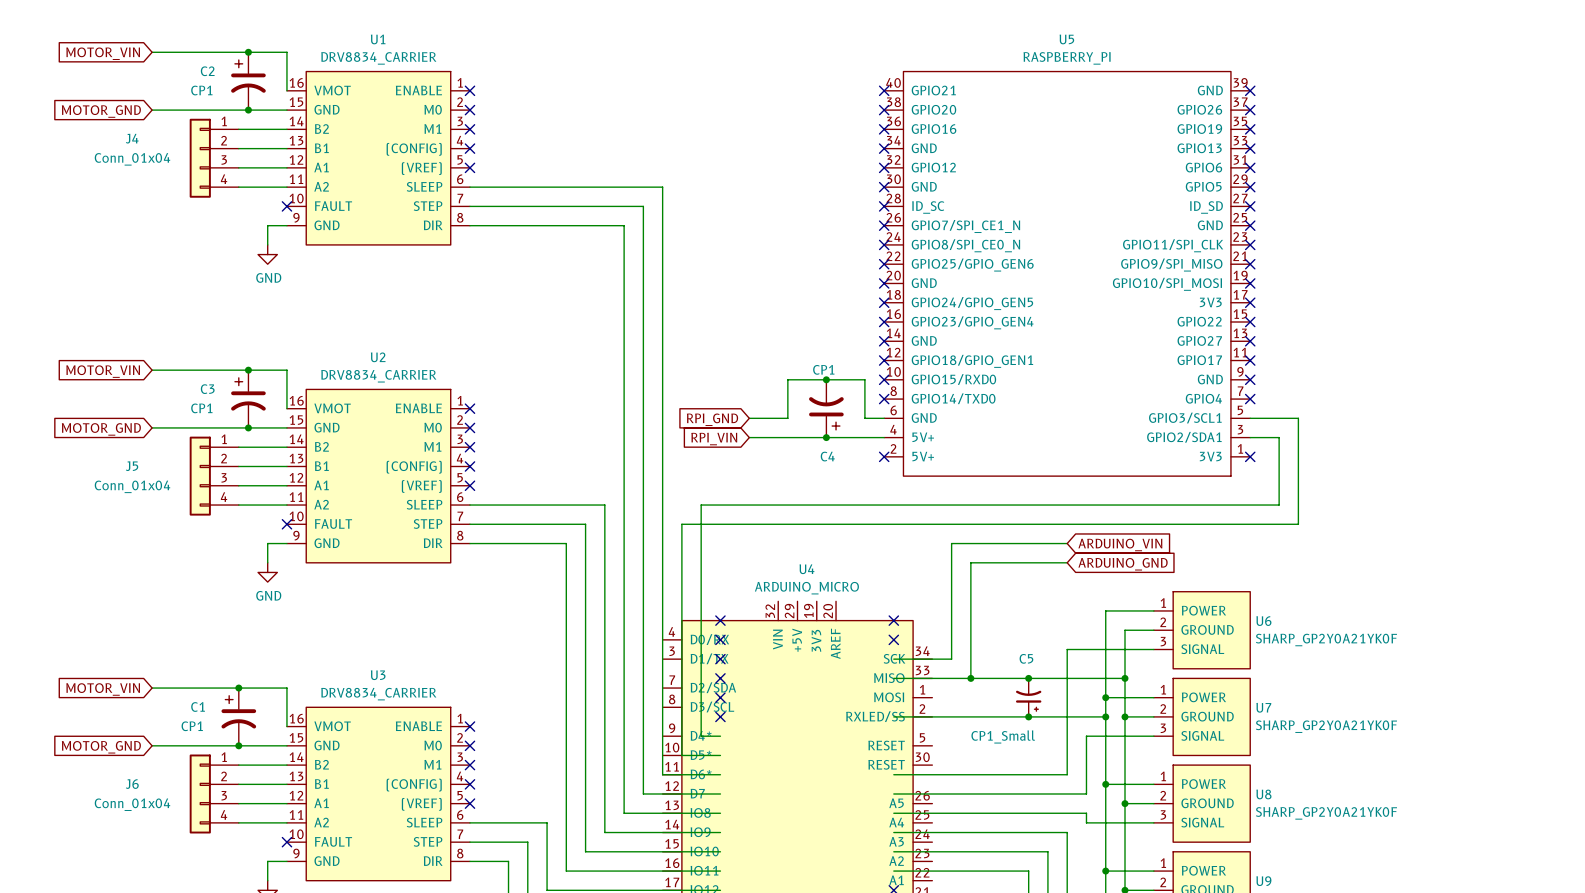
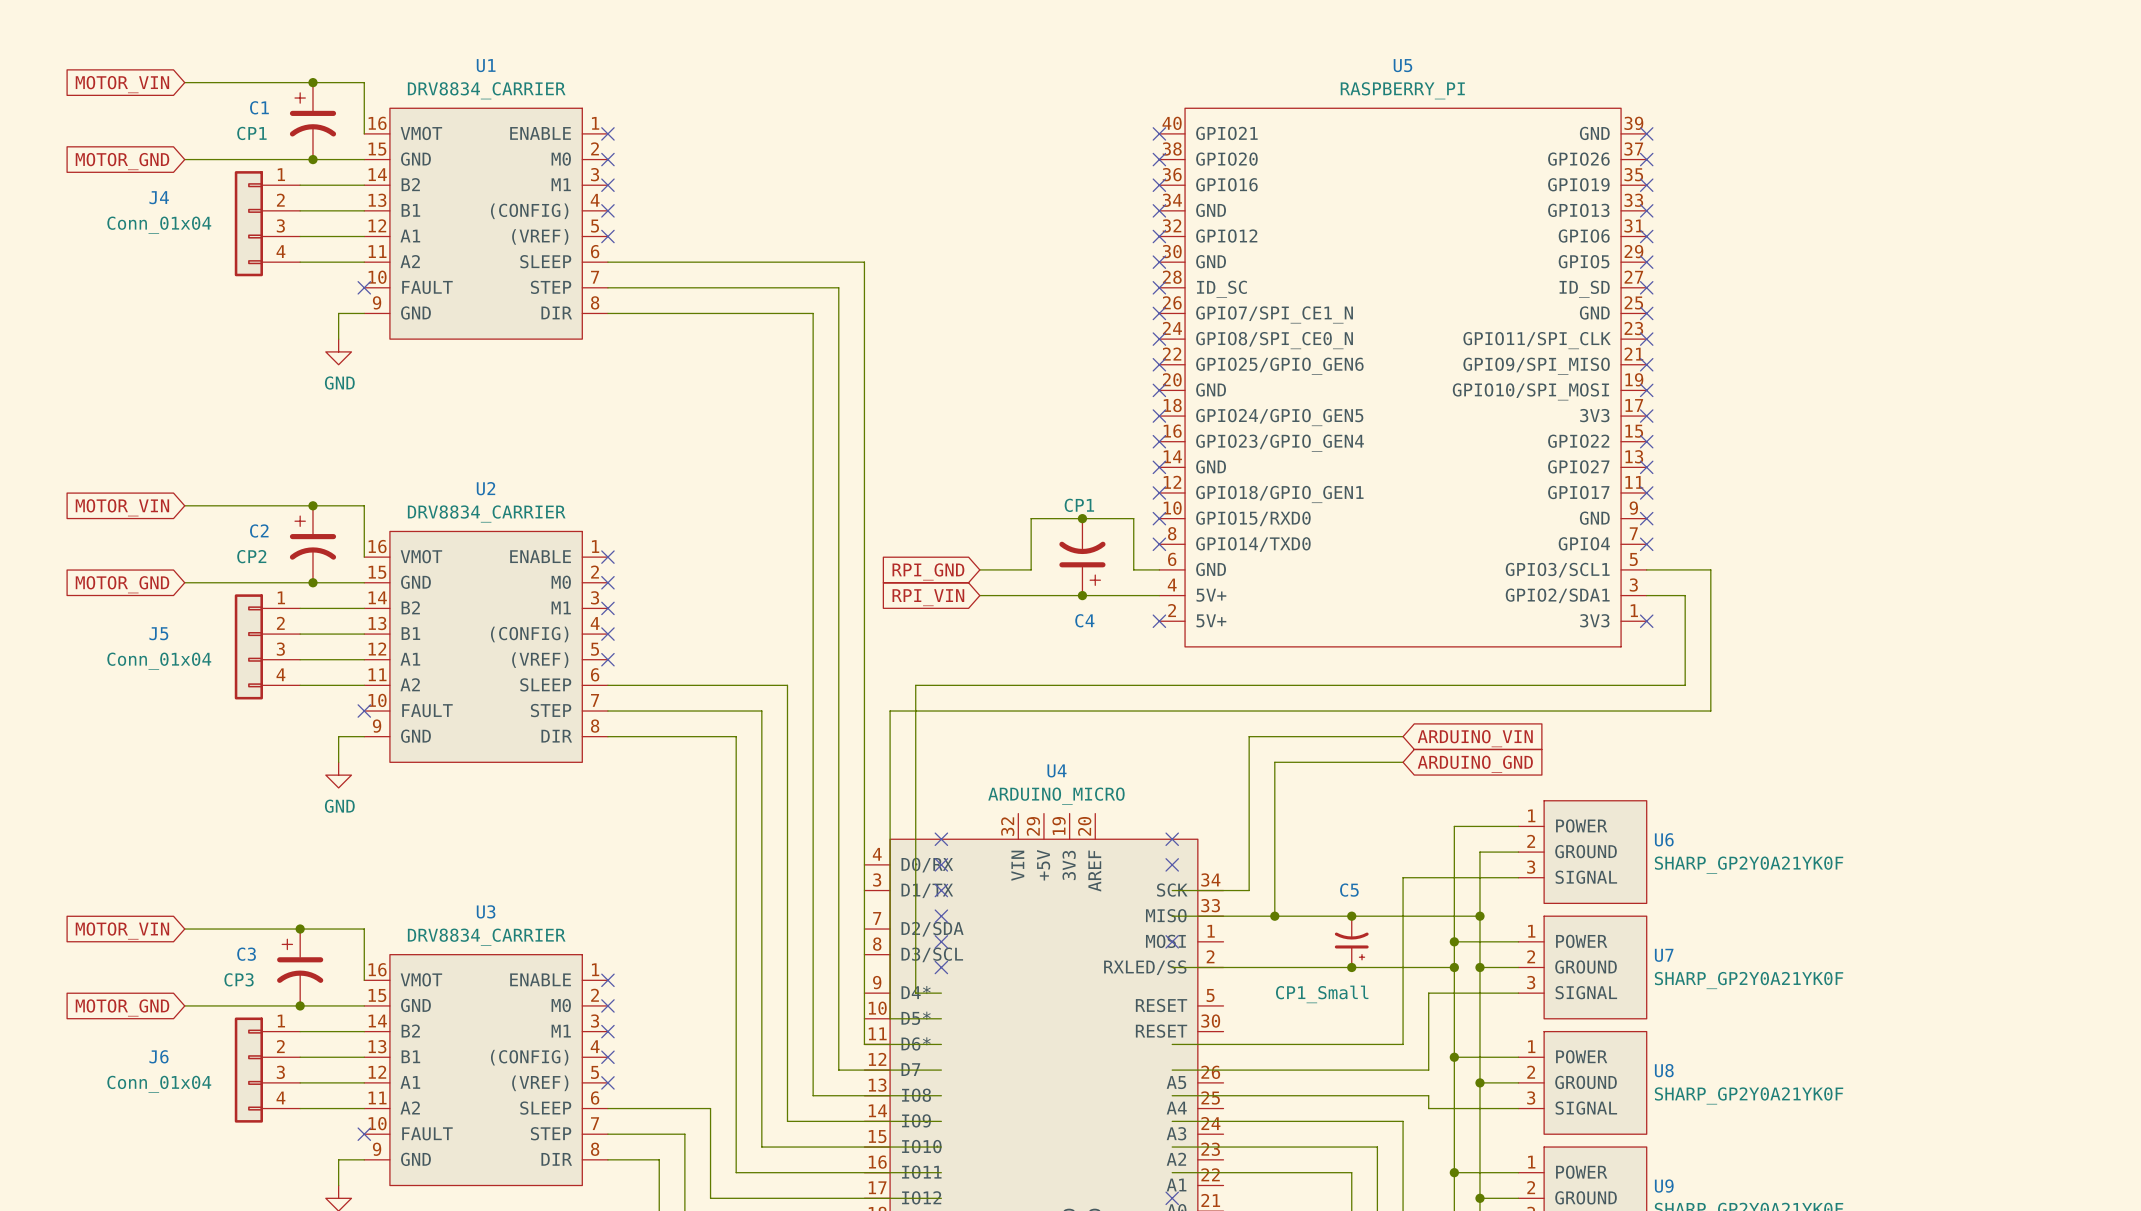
C2 name: C2 (207, 71) -> C1 (259, 107)
C3 name: C3 (207, 389) -> C2 (259, 530)
C3 value: CP1 (201, 408) -> CP2 (251, 556)
no-connect mark: none -> (1172, 941)
C1 name: C1 (198, 706) -> C3 (246, 954)
C1 value: CP1 (192, 726) -> CP3 (239, 979)

